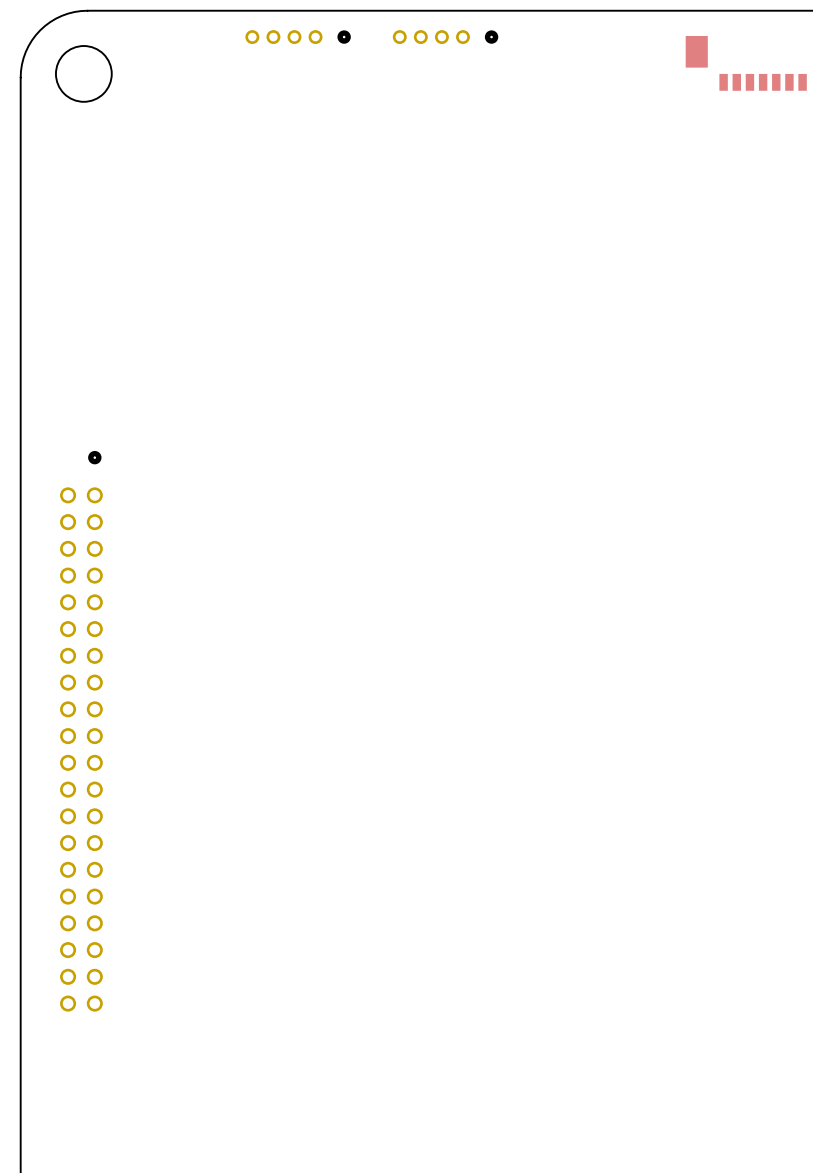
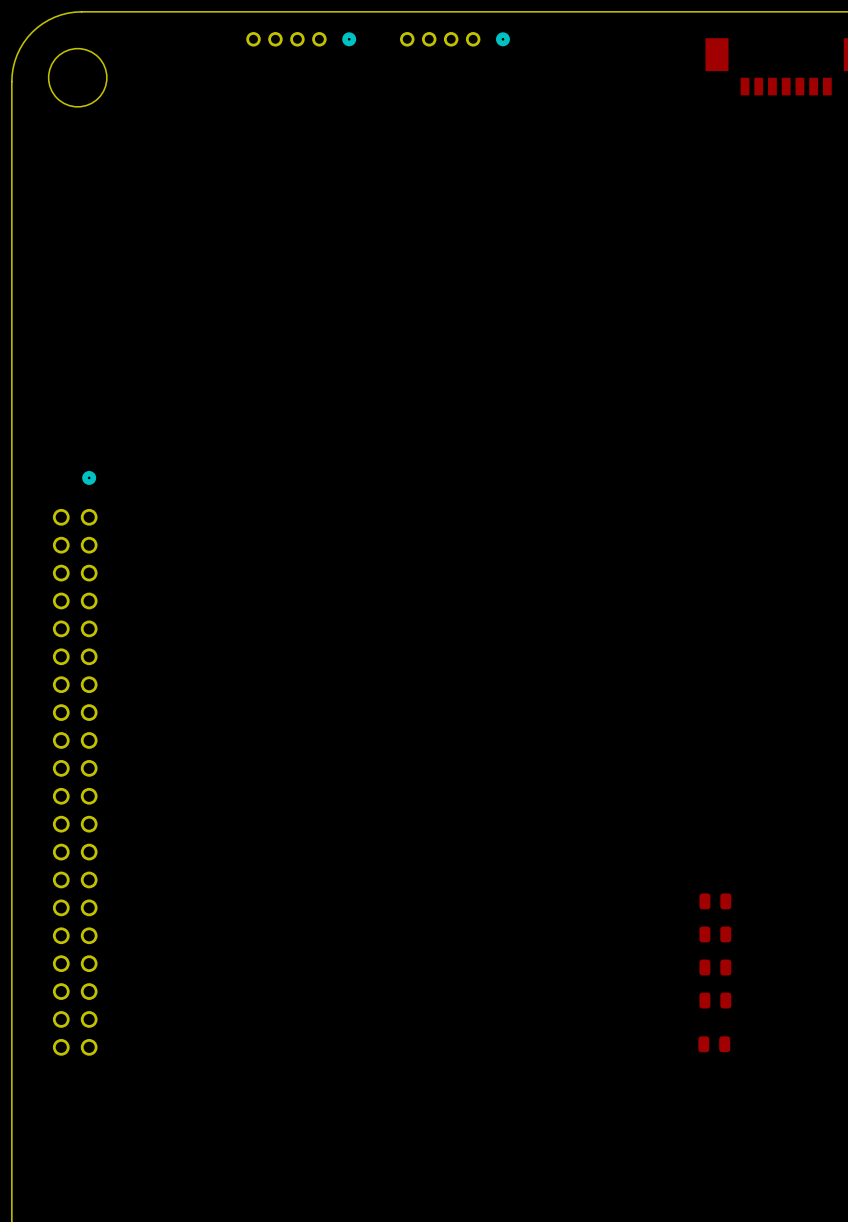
part: none -> (715, 901)
part: none -> (715, 934)
part: none -> (715, 967)
part: none -> (715, 1000)
part: none -> (714, 1044)

